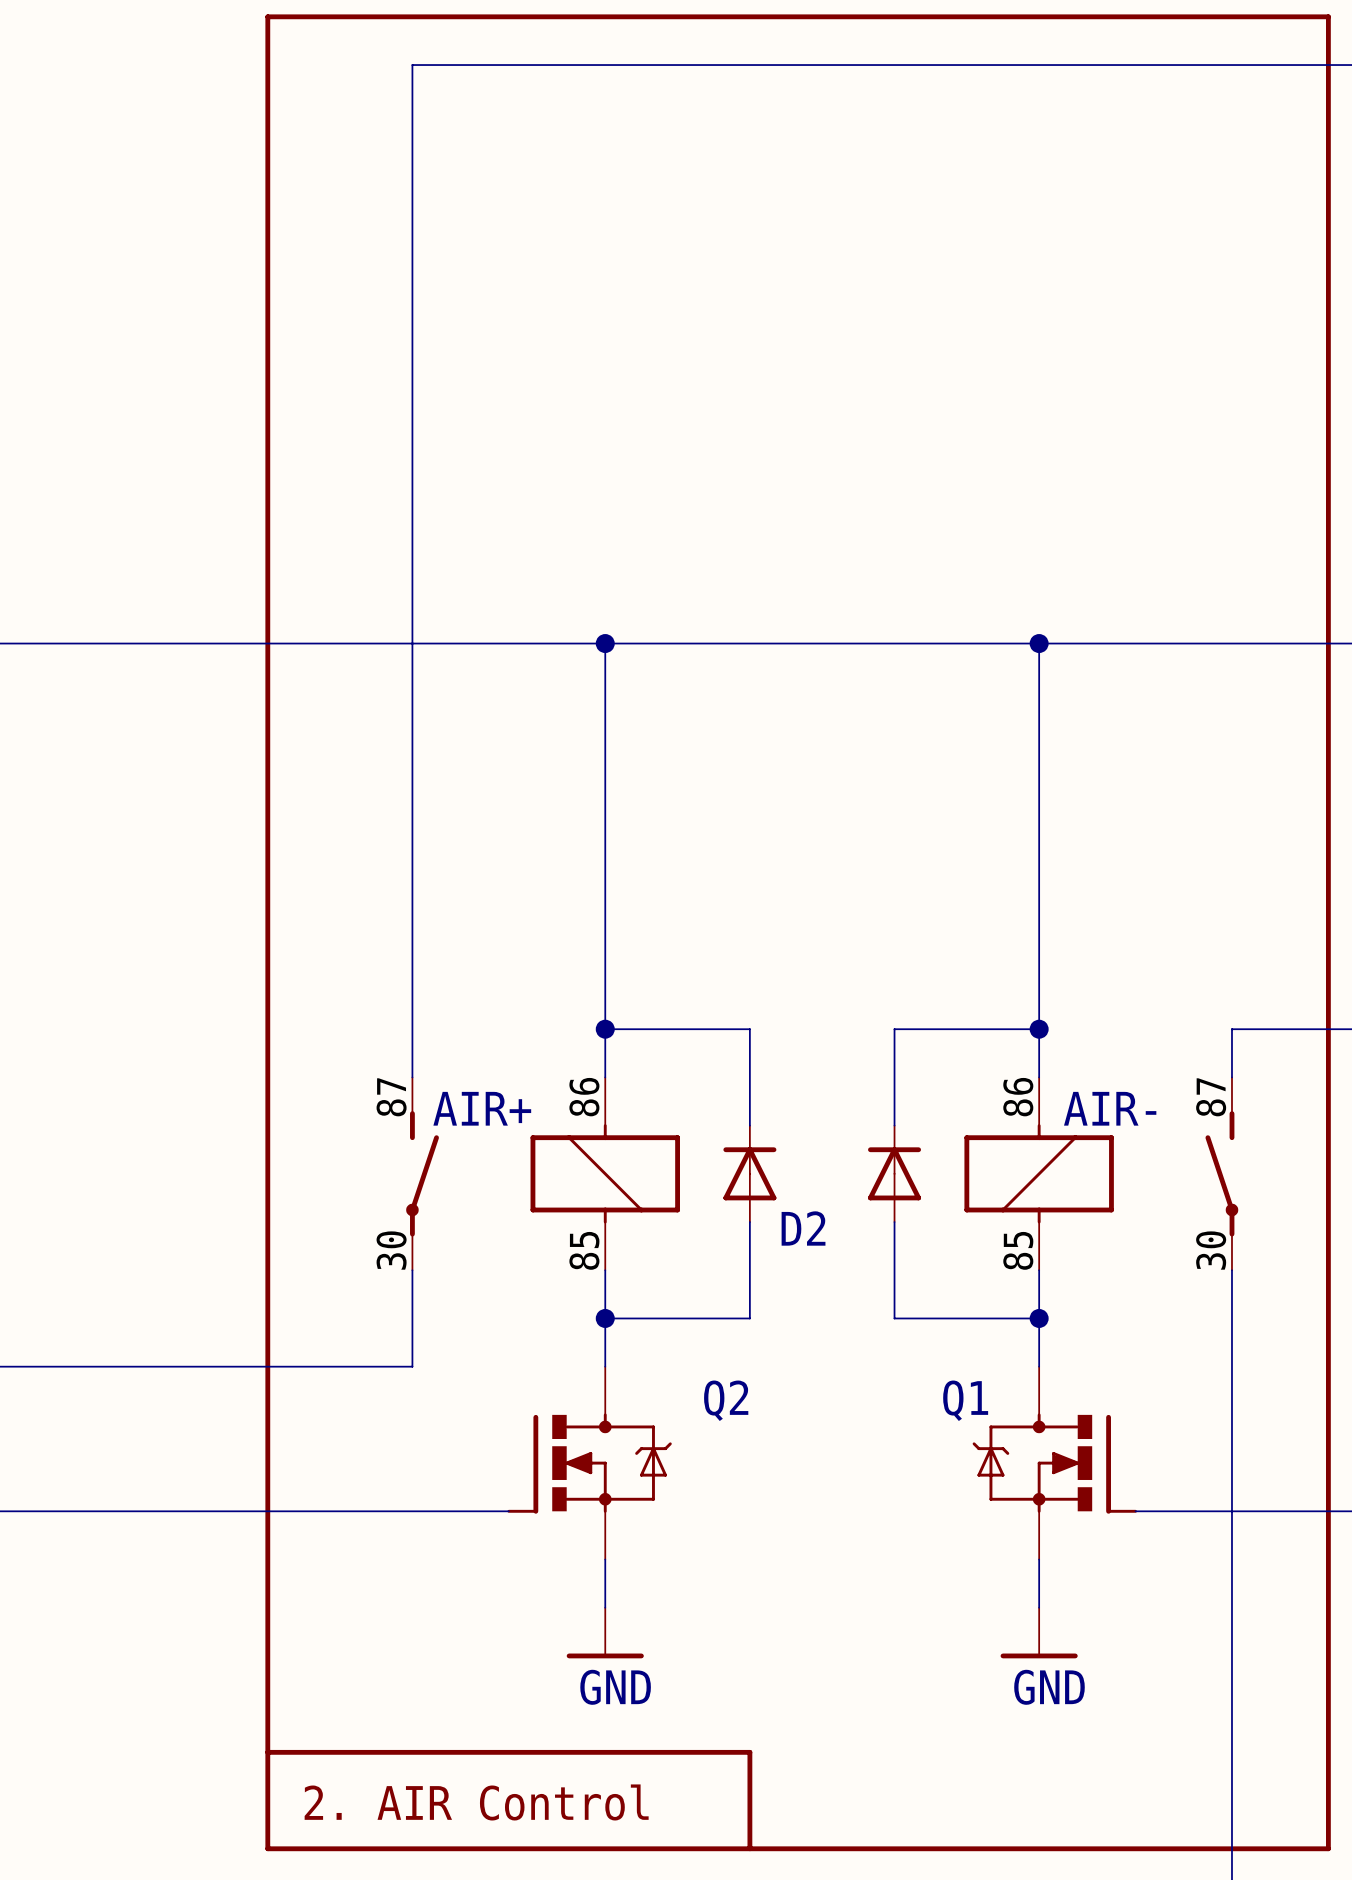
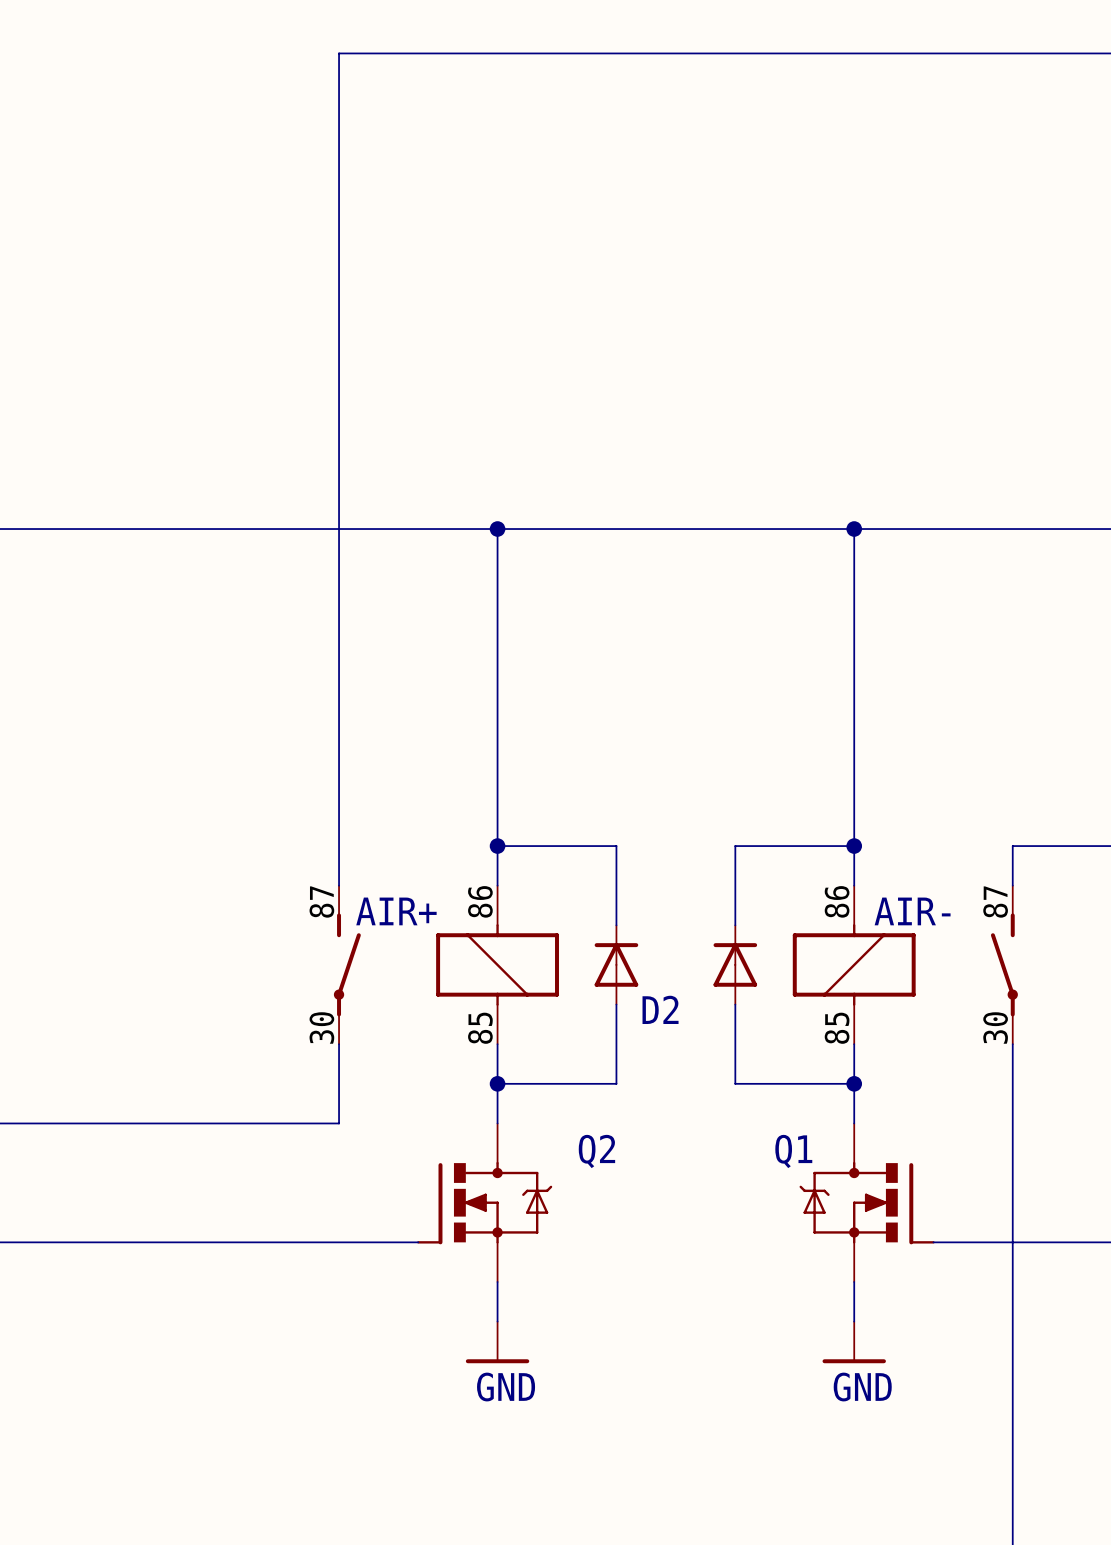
line: (267, 16) (267, 1848) (1328, 1848) (1328, 16) (267, 16) -> none
line: (267, 1752) (749, 1752) (749, 1848) -> none
text: 2. AIR Control (476, 1802) -> none

